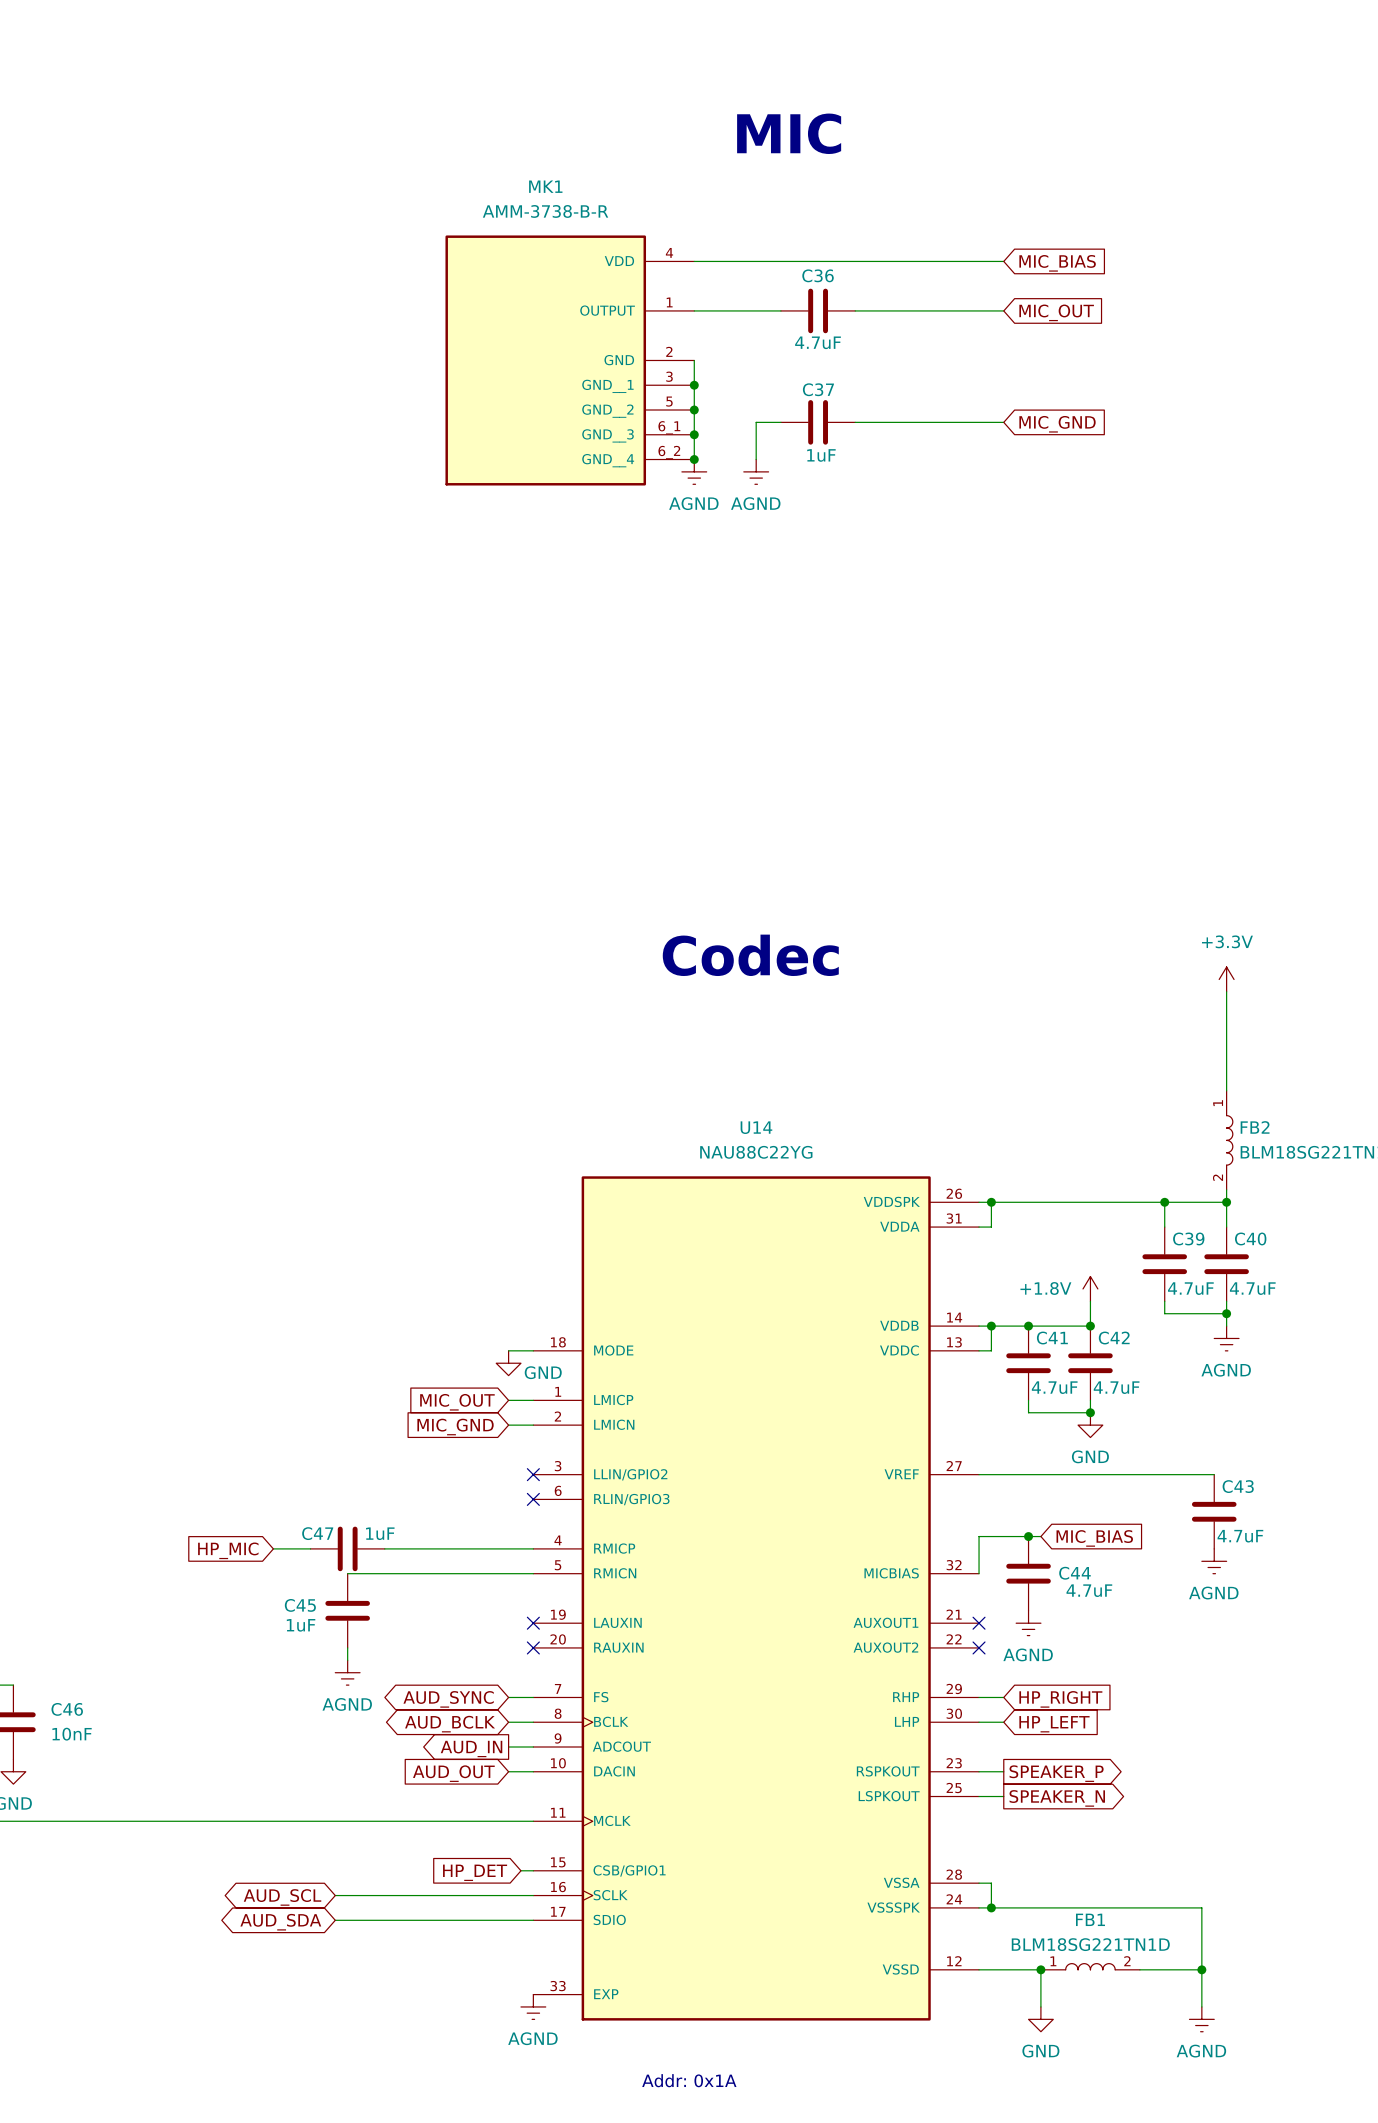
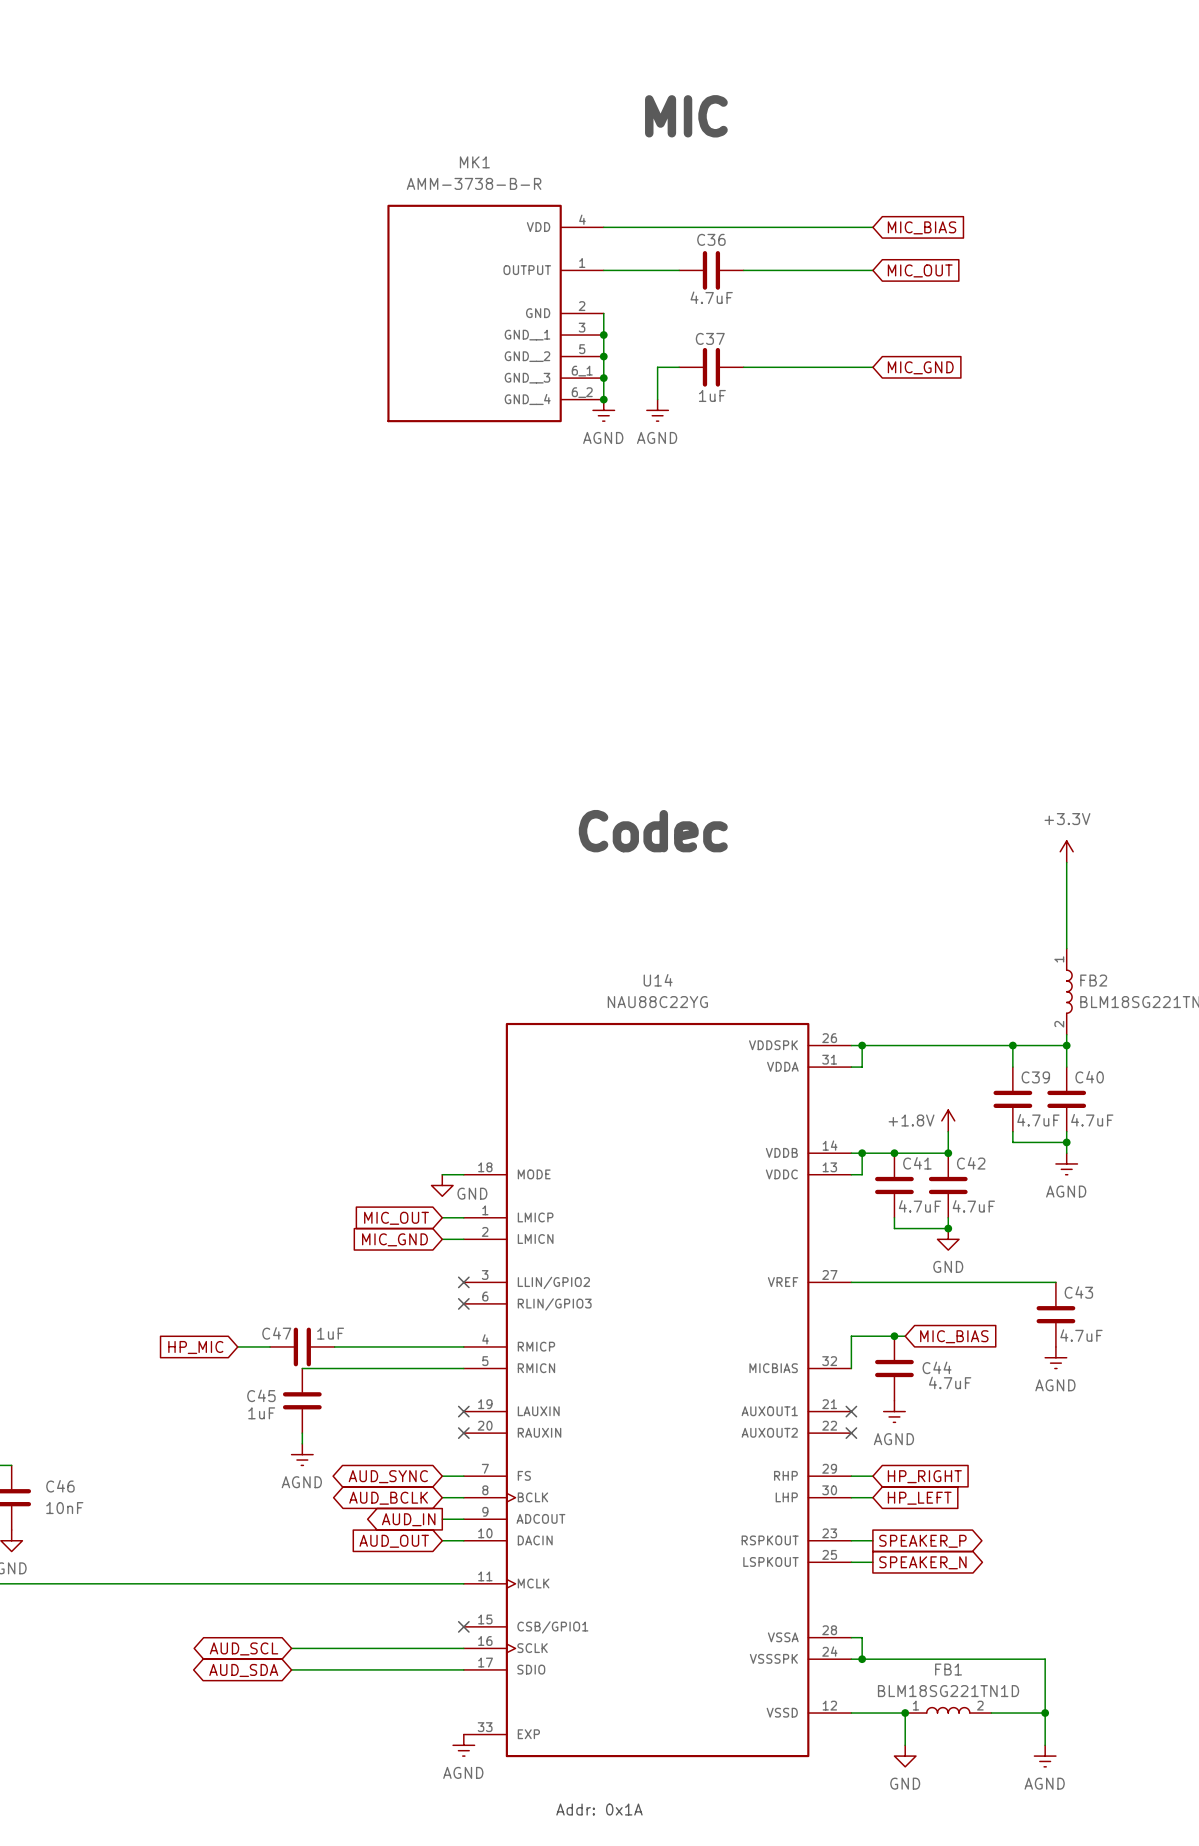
wire: (520, 1870) (533, 1870) -> none
no-connect mark: none -> (463, 1626)
global label: HP_DET (475, 1872) -> none

